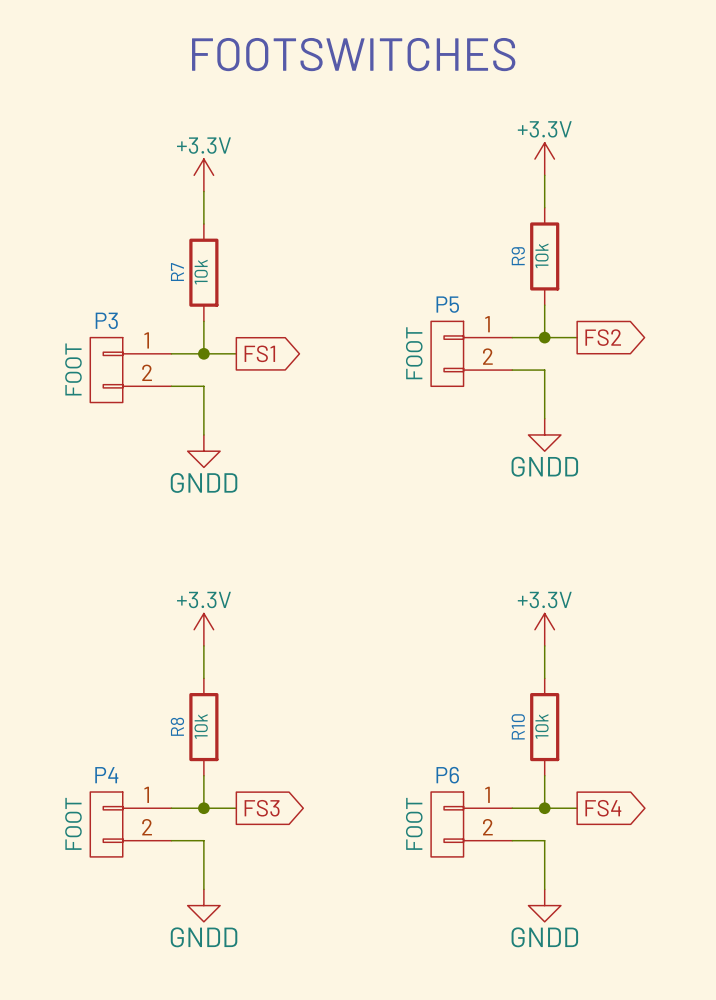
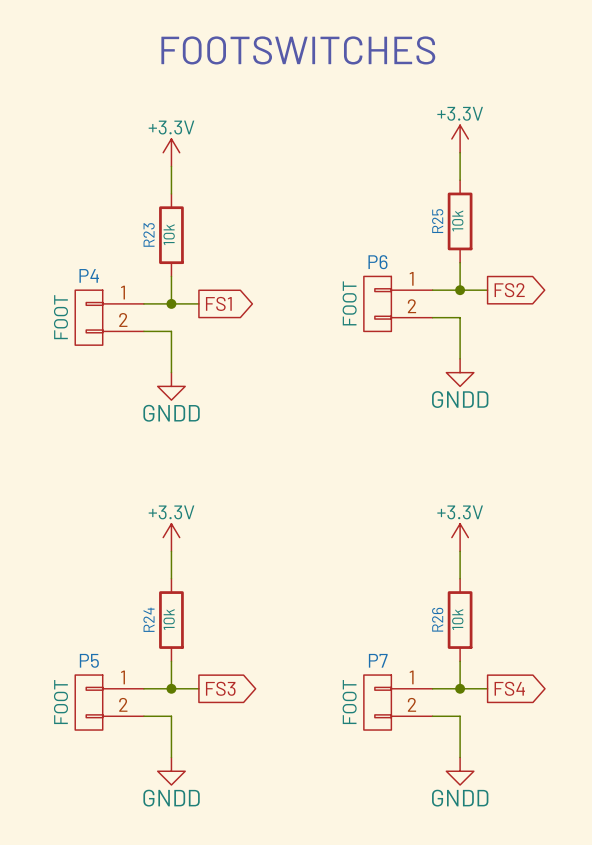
R9 name: R9 (518, 256) -> R25 (437, 221)
R7 name: R7 (177, 272) -> R23 (149, 234)
P5 name: P5 (447, 304) -> P6 (377, 262)
P3 name: P3 (106, 320) -> P4 (89, 275)
R8 name: R8 (177, 726) -> R24 (148, 619)
R10 name: R10 (518, 726) -> R26 (437, 619)
P4 name: P4 (106, 775) -> P5 (89, 660)
P6 name: P6 (447, 775) -> P7 (378, 660)

